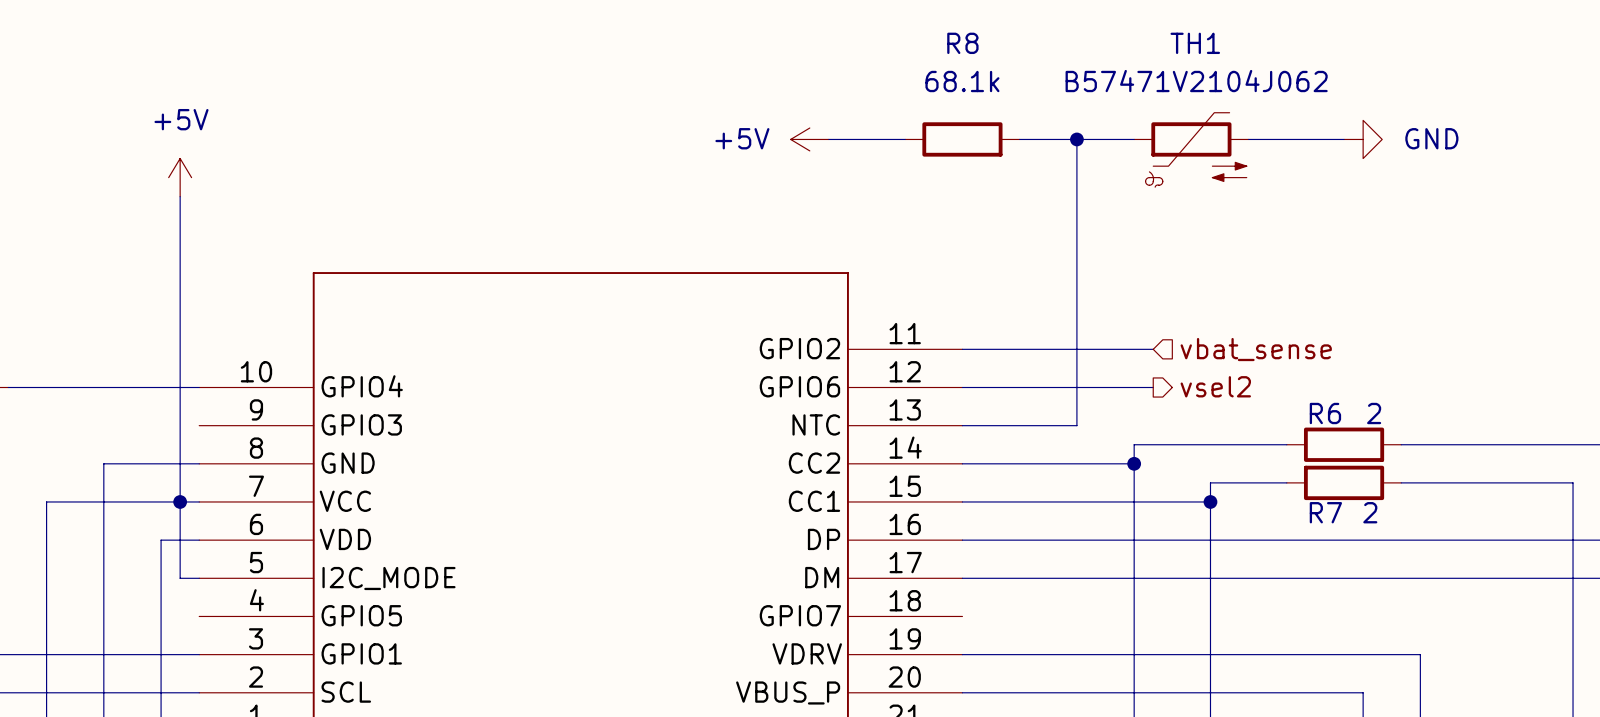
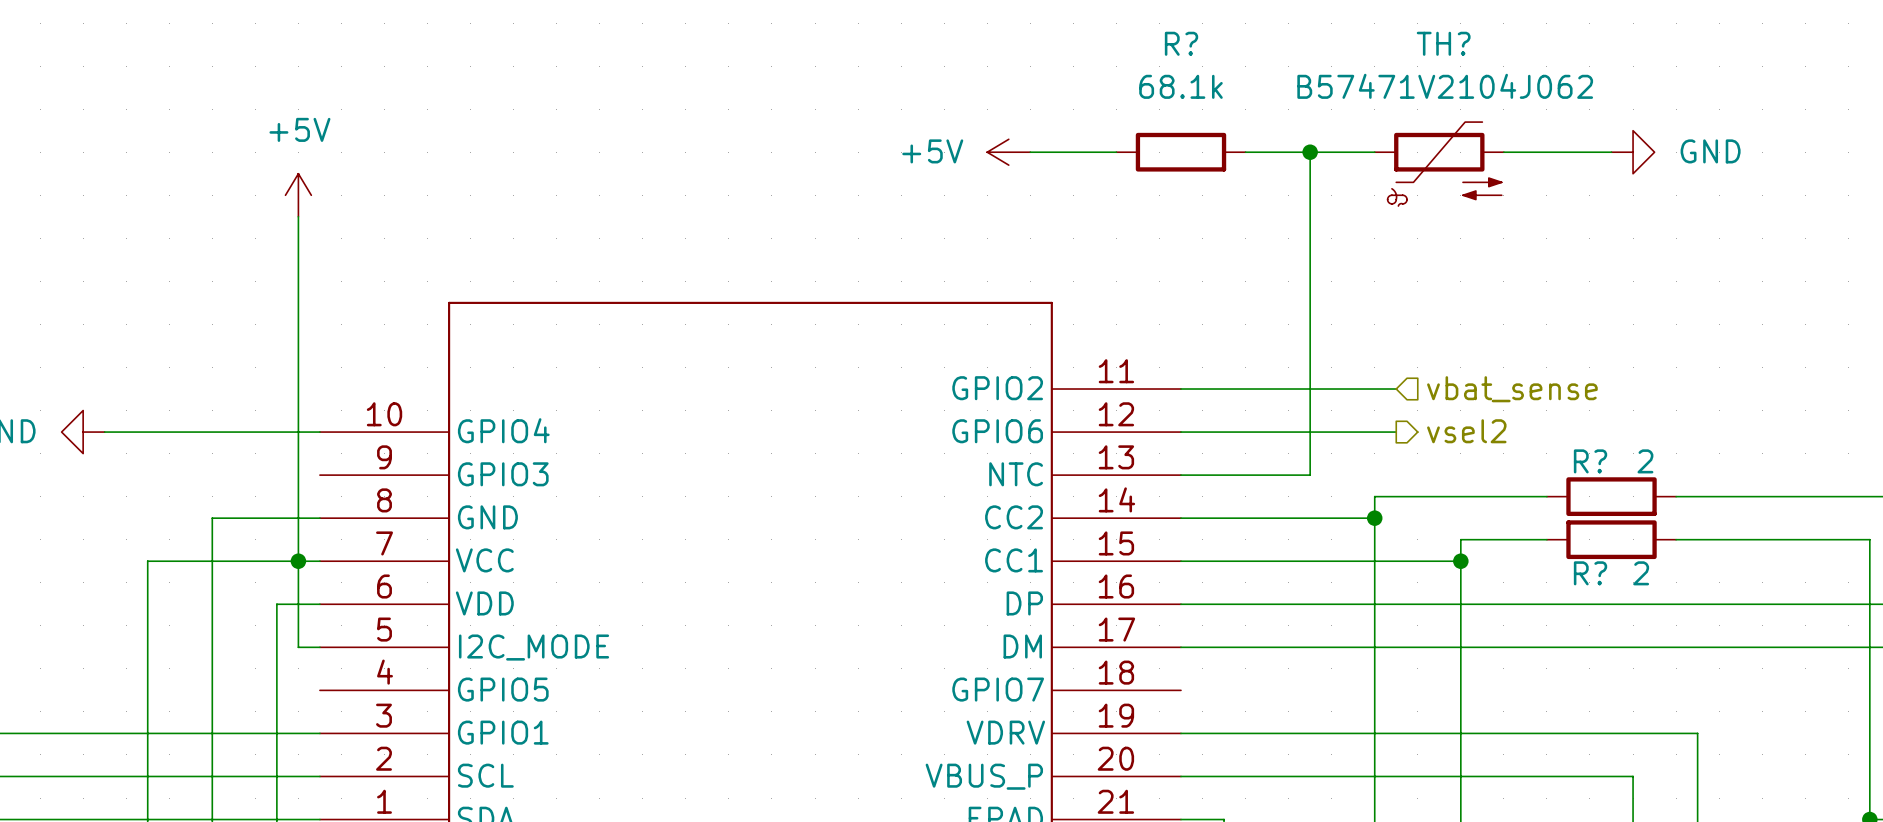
R8 name: R8 (962, 43) -> R? (1181, 43)
TH1 name: TH1 (1195, 43) -> TH? (1443, 43)
R6 name: R6 (1325, 413) -> R? (1590, 461)
R7 name: R7 (1325, 512) -> R? (1590, 573)

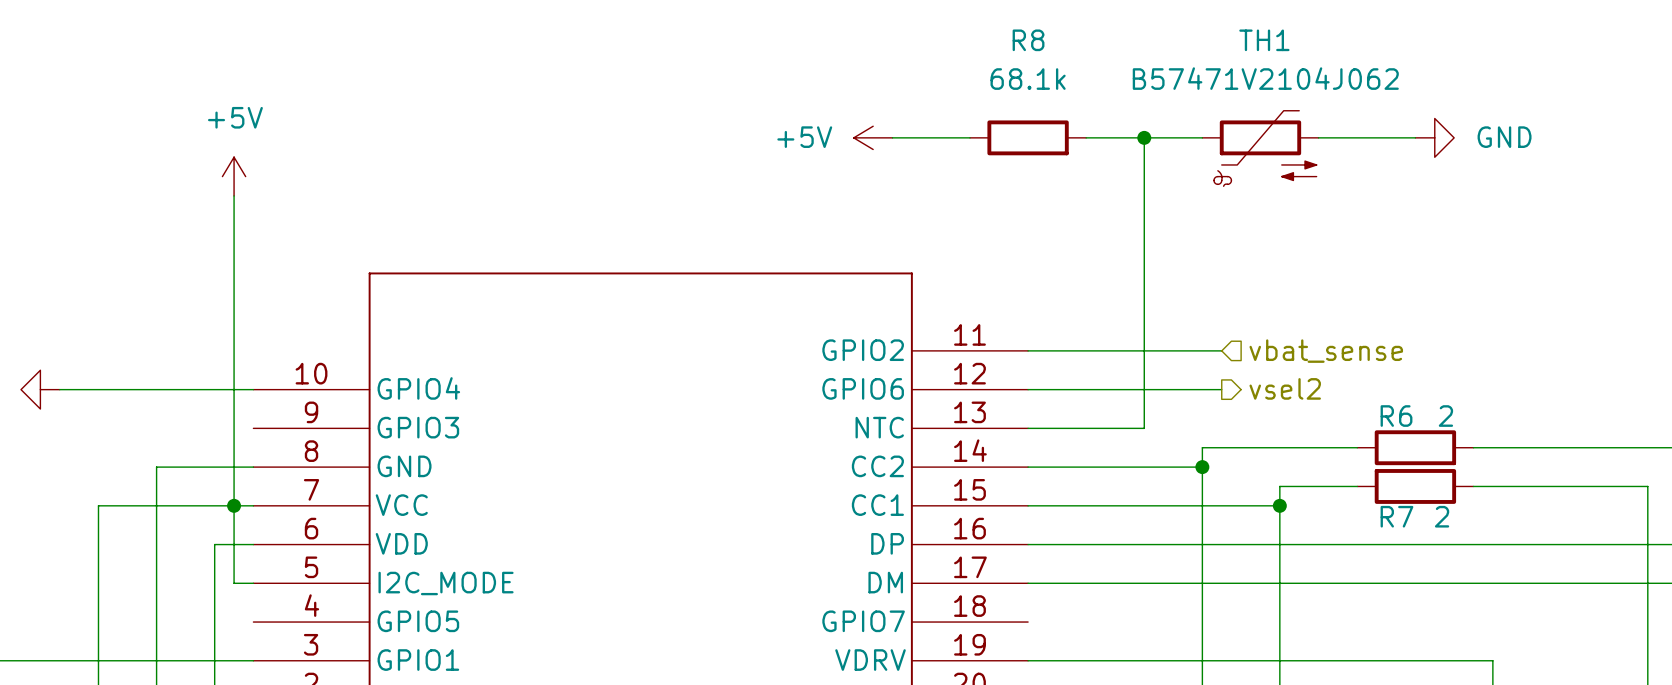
R? name: R? (1181, 43) -> R8 (1028, 40)
TH? name: TH? (1443, 43) -> TH1 (1264, 40)
R? name: R? (1590, 461) -> R6 (1396, 416)
R? name: R? (1590, 573) -> R7 (1396, 516)

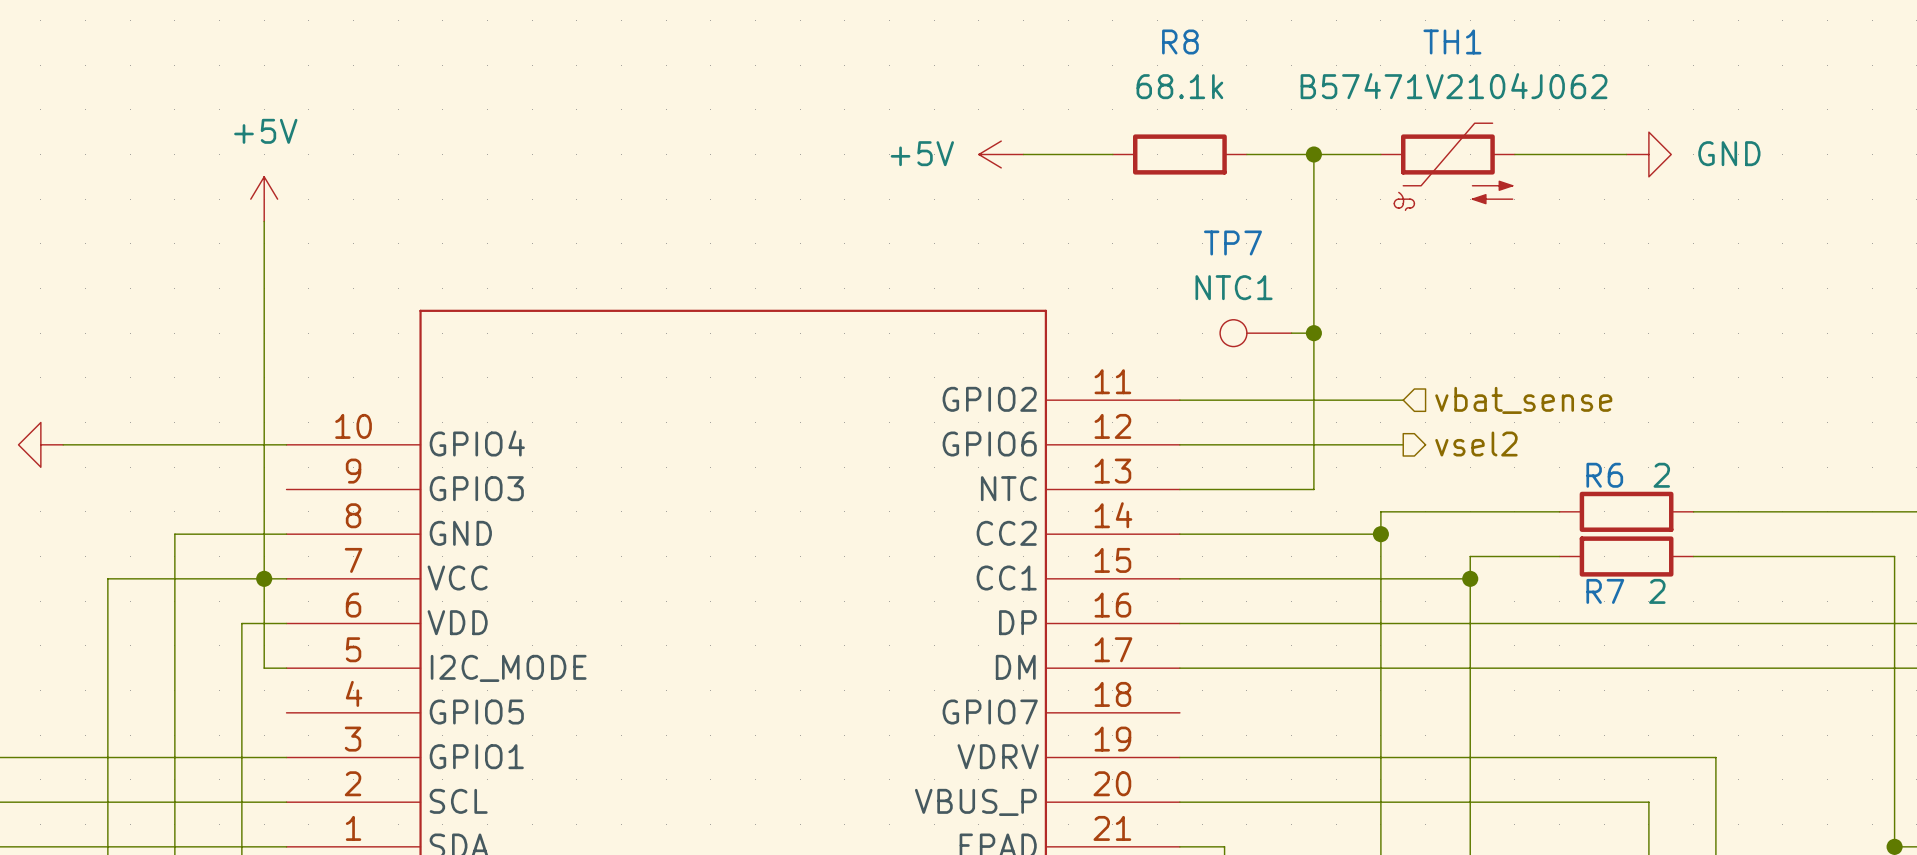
TP7: none -> NTC1 (1255, 333)
wire: none -> (1291, 333) (1313, 333)
junction: none -> (1313, 333)

